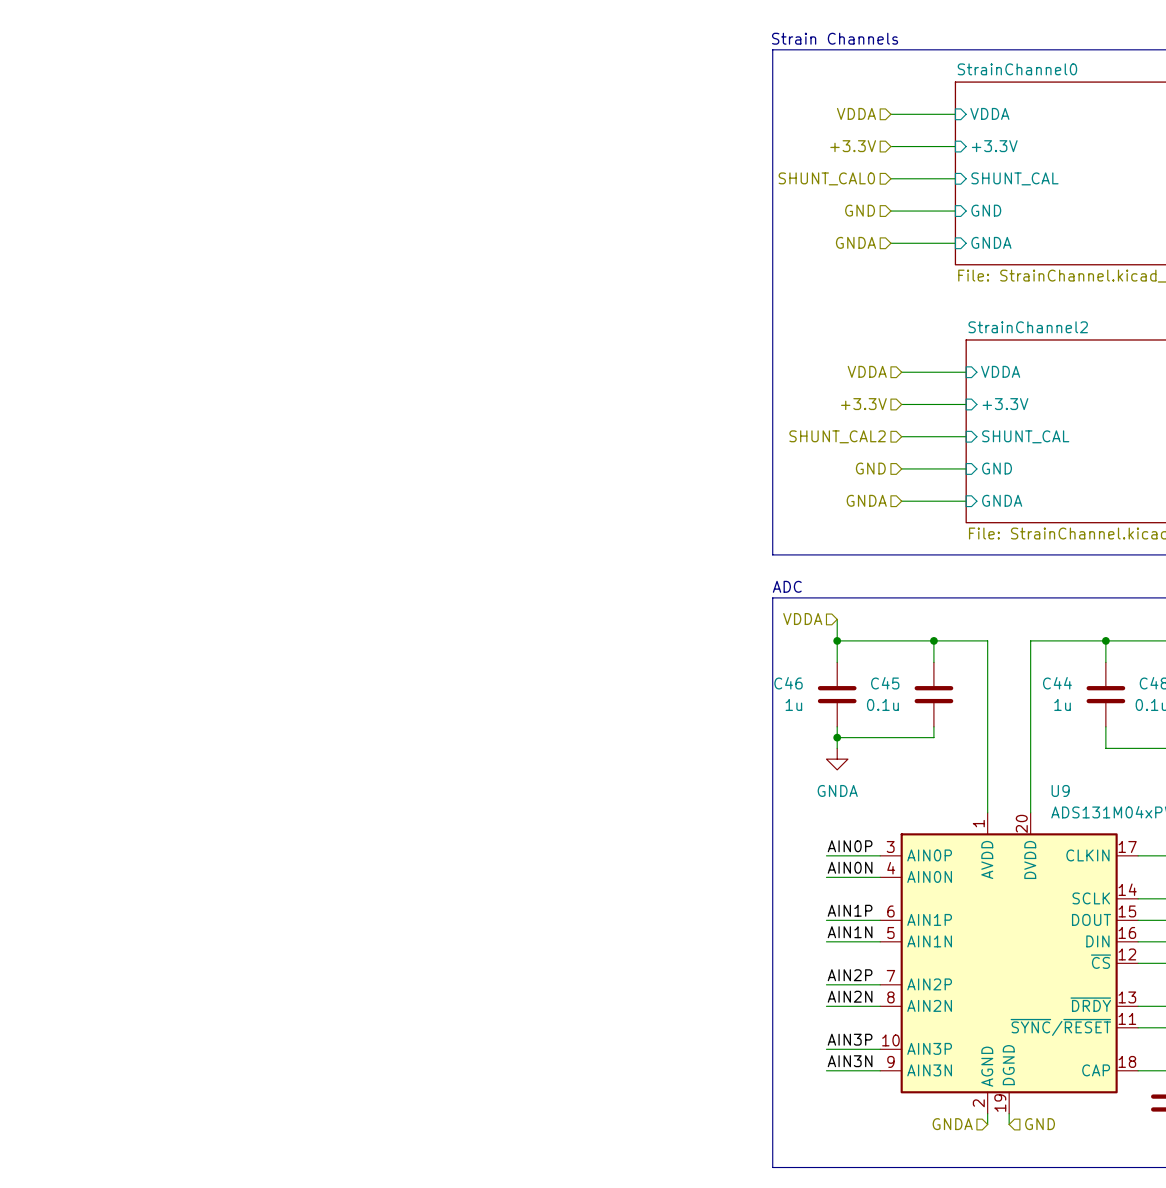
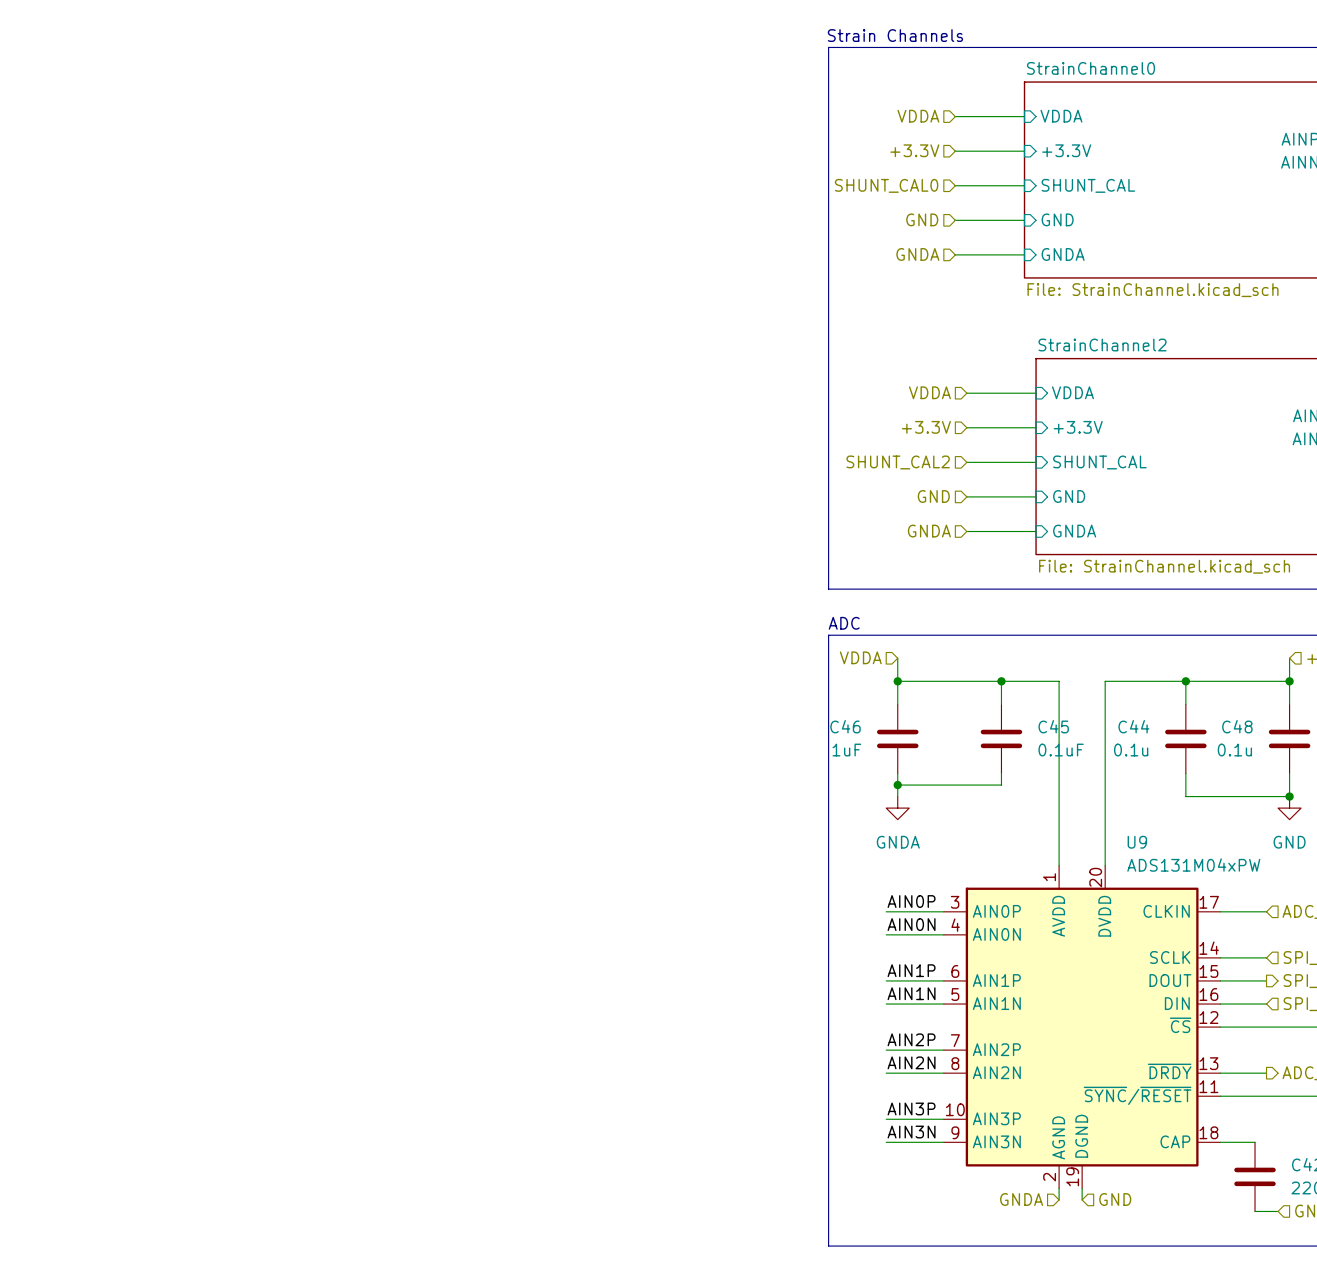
C45 name position: C45 (885, 683) -> C45 (1053, 726)
C46 value: 1u (793, 704) -> 1uF (846, 750)
C45 value: 0.1u (882, 704) -> 0.1uF (1061, 750)
C44 value: 1u (1062, 704) -> 0.1u (1131, 750)

